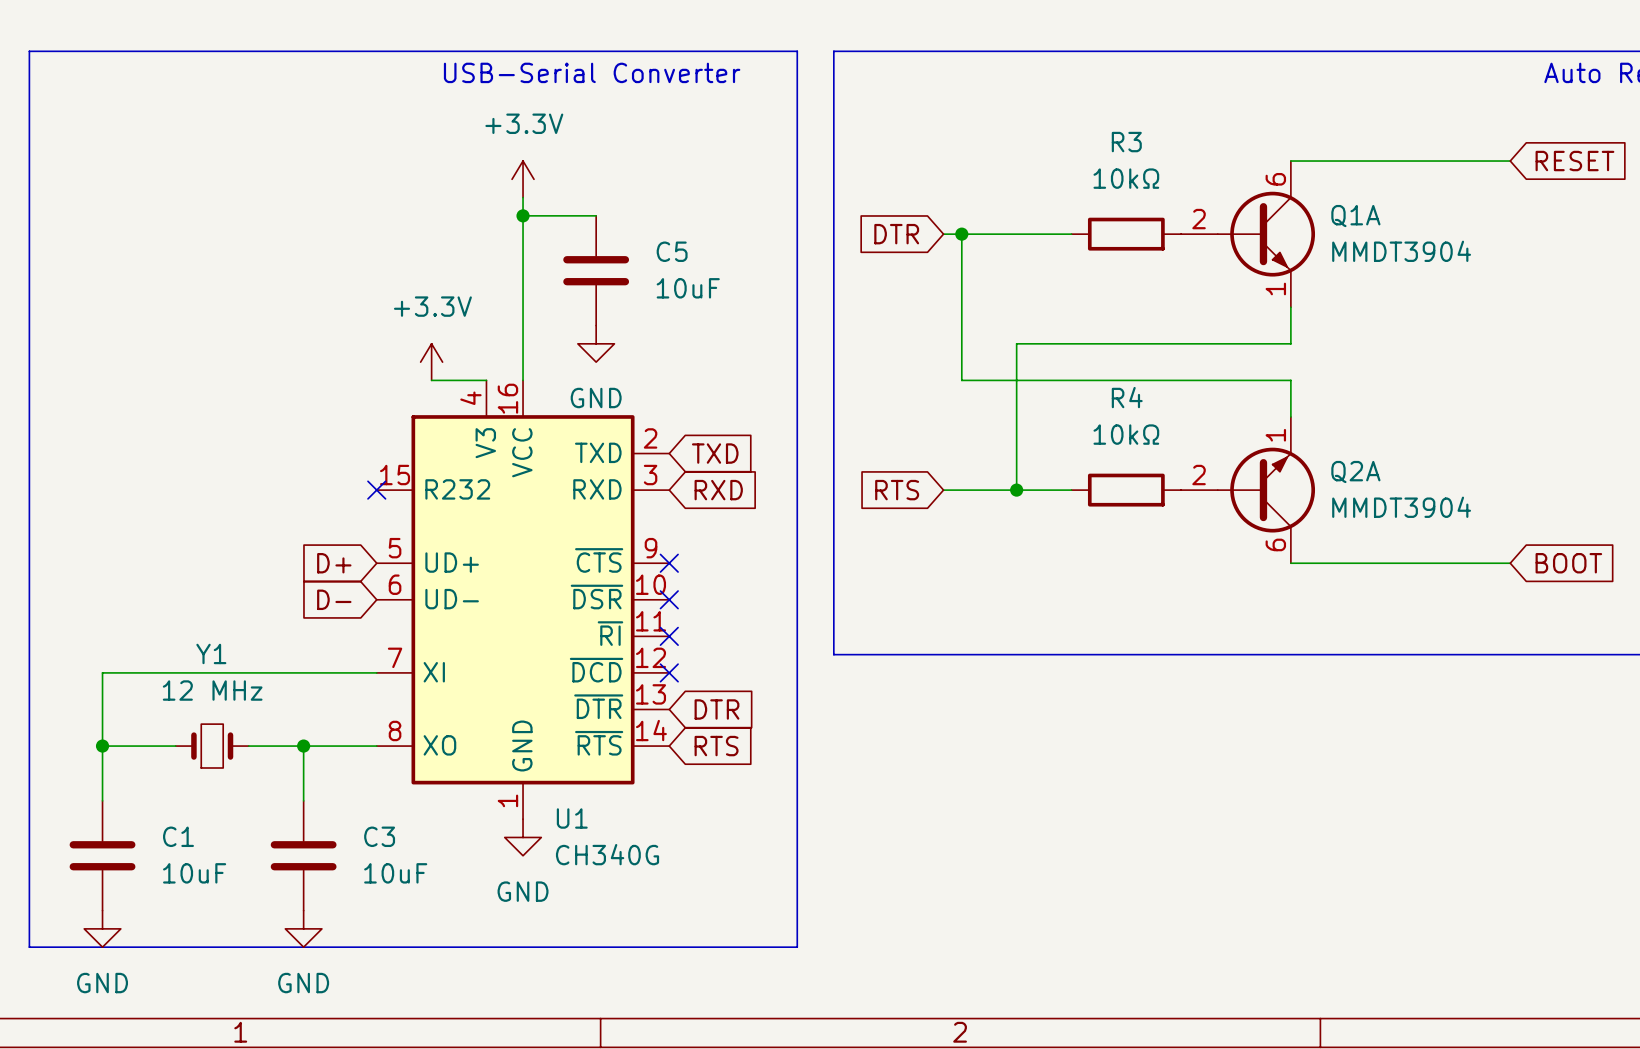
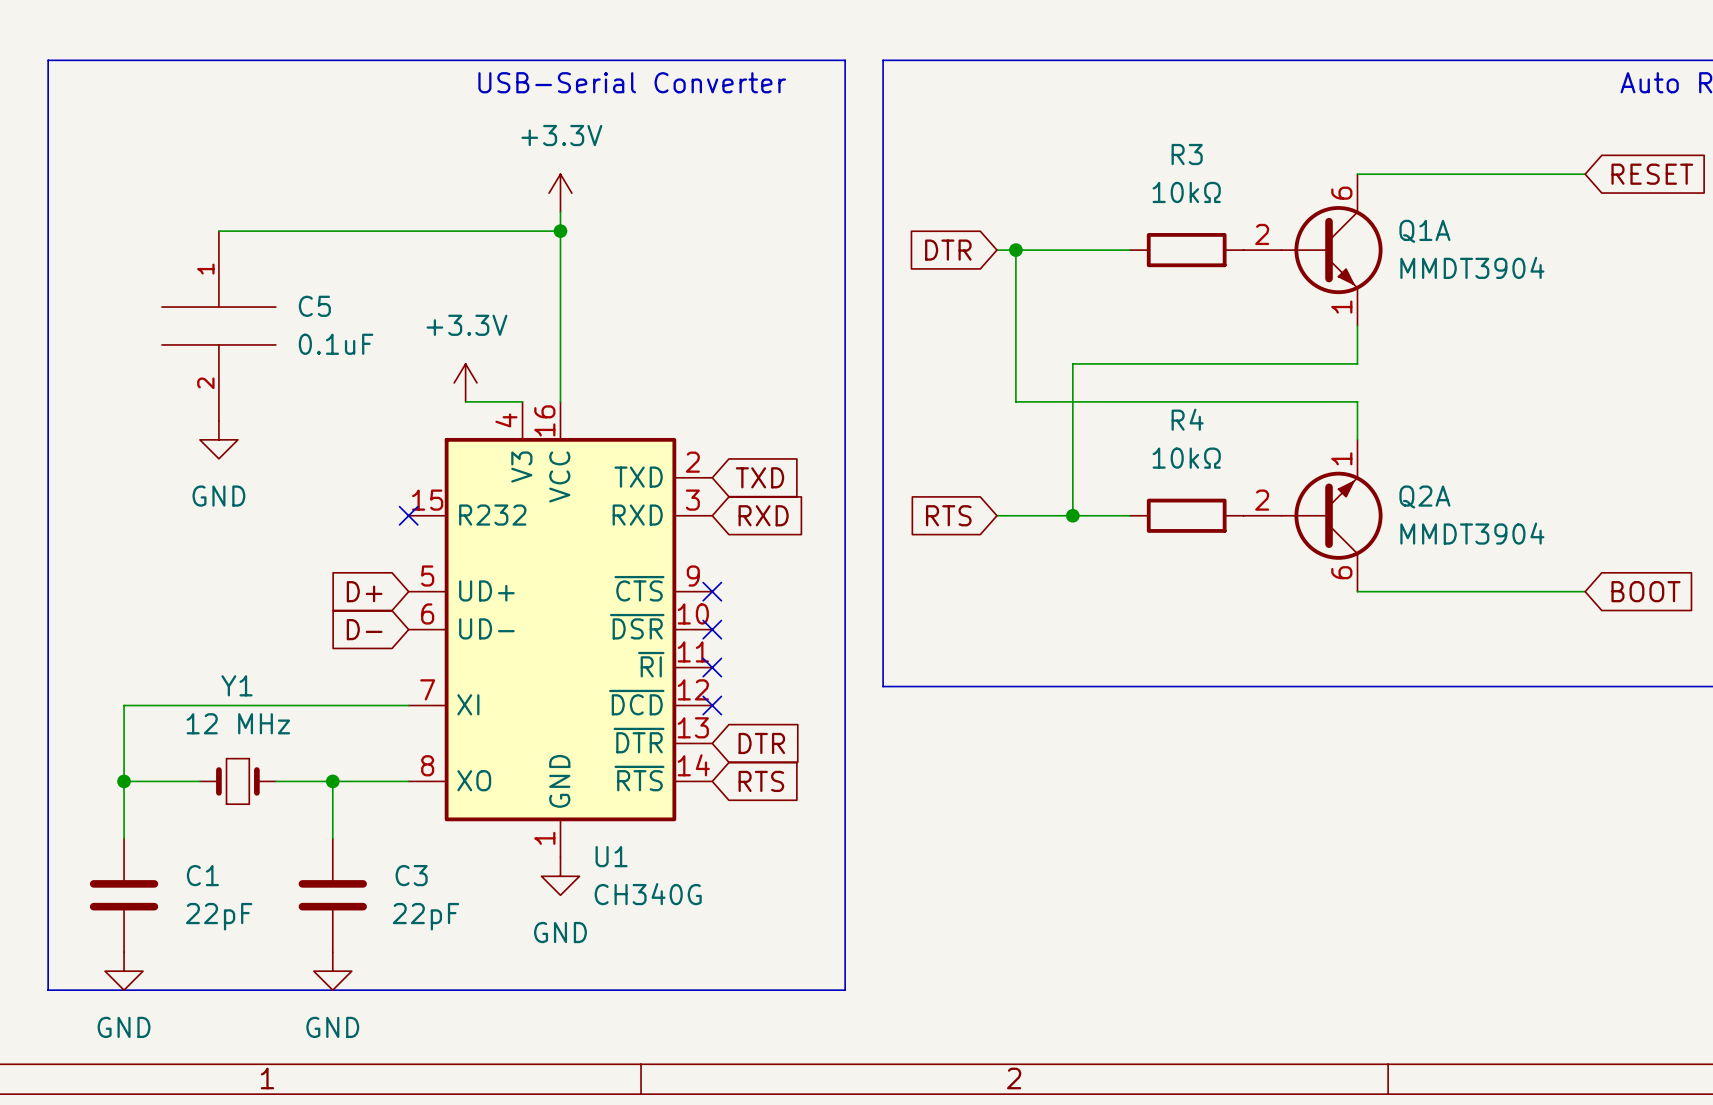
wire: (523, 215) (596, 215) -> (560, 231) (218, 231)
C5 symbol: [563, 215, 630, 326] -> [161, 231, 276, 421]
C5 value: 10uF (688, 288) -> 0.1uF (336, 344)
power symbol: GND (596, 343) -> none
power symbol: none -> GND (218, 439)
C1 value: 10uF (194, 873) -> 22pF (219, 916)
C3 value: 10uF (395, 873) -> 22pF (425, 916)

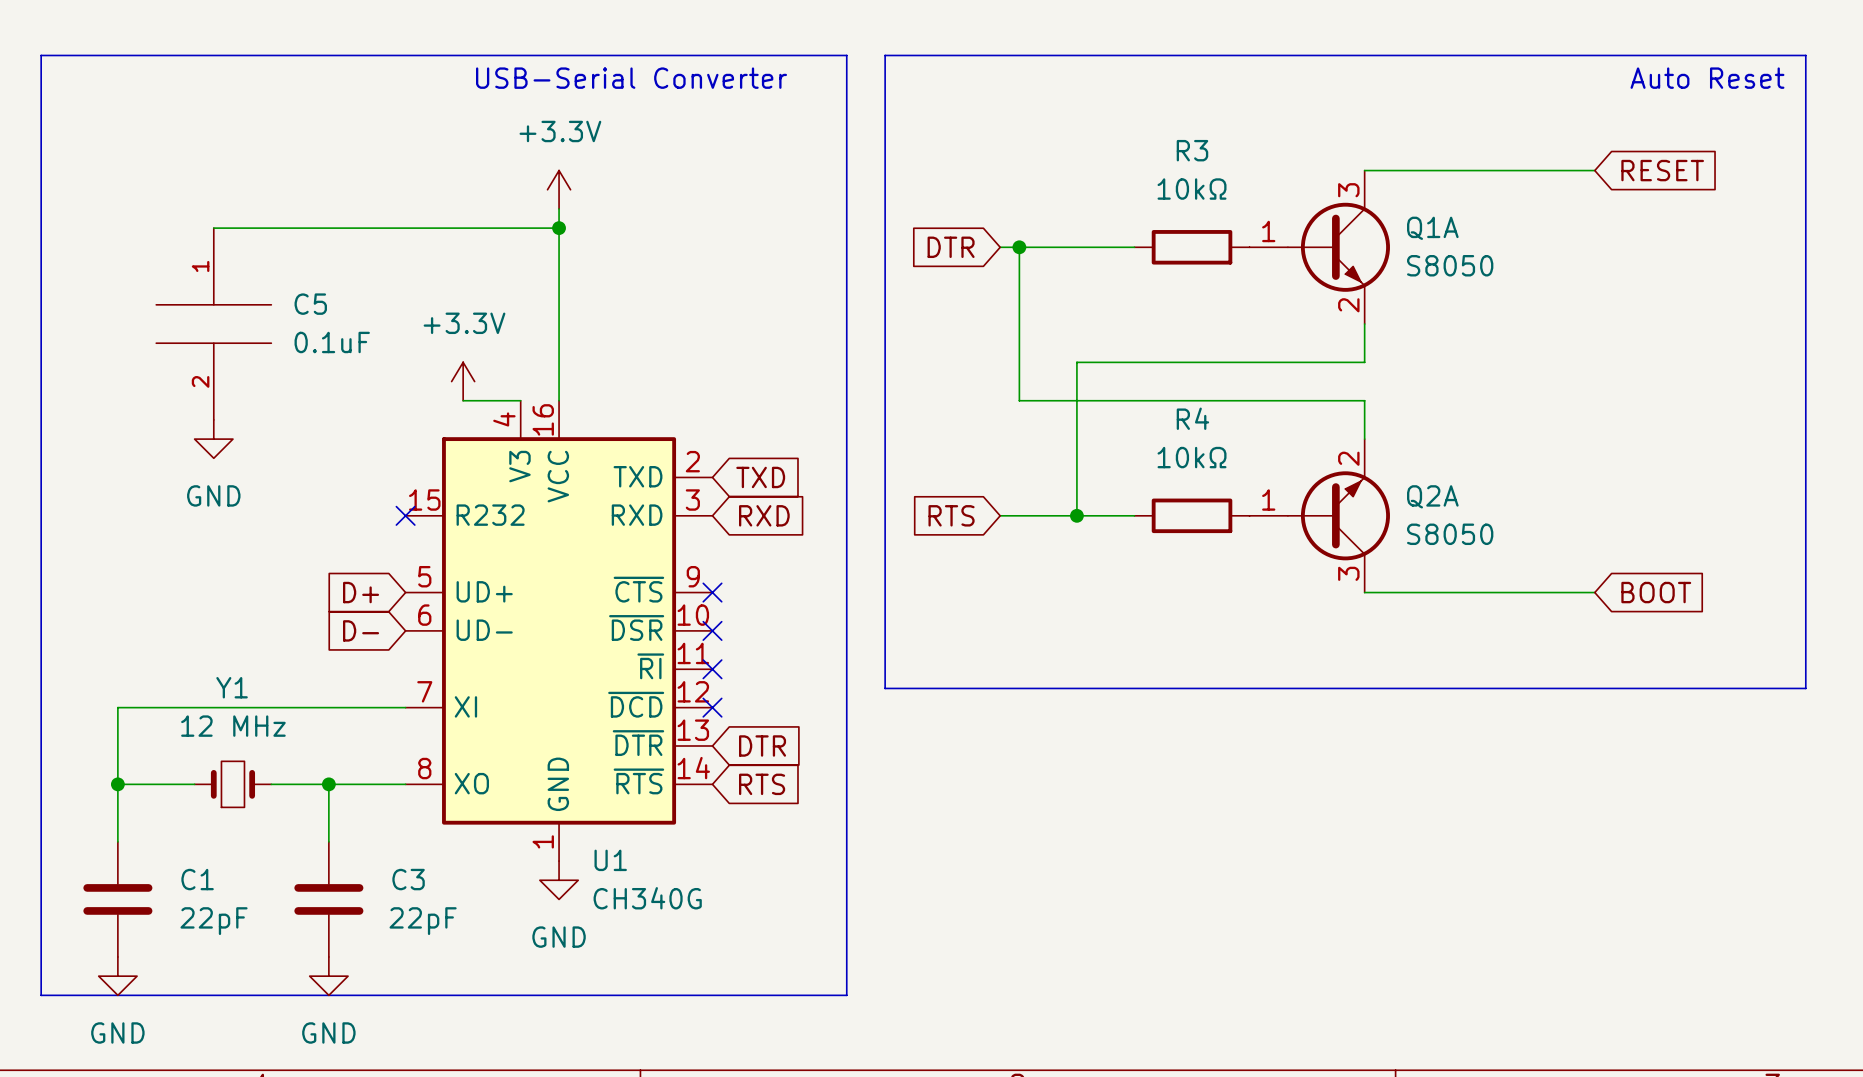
Q1A pin number: 6 (1341, 193) -> 3 (1348, 190)
Q1A pin number: 2 (1262, 234) -> 1 (1268, 231)
Q1A value: MMDT3904 (1472, 267) -> S8050 (1450, 265)
Q1A pin number: 1 (1341, 307) -> 2 (1348, 305)
Q2A pin number: 1 (1341, 458) -> 2 (1348, 458)
Q2A pin number: 2 (1262, 500) -> 1 (1268, 500)
Q2A value: MMDT3904 (1472, 533) -> S8050 (1450, 534)
Q2A pin number: 6 (1341, 572) -> 3 (1348, 573)

